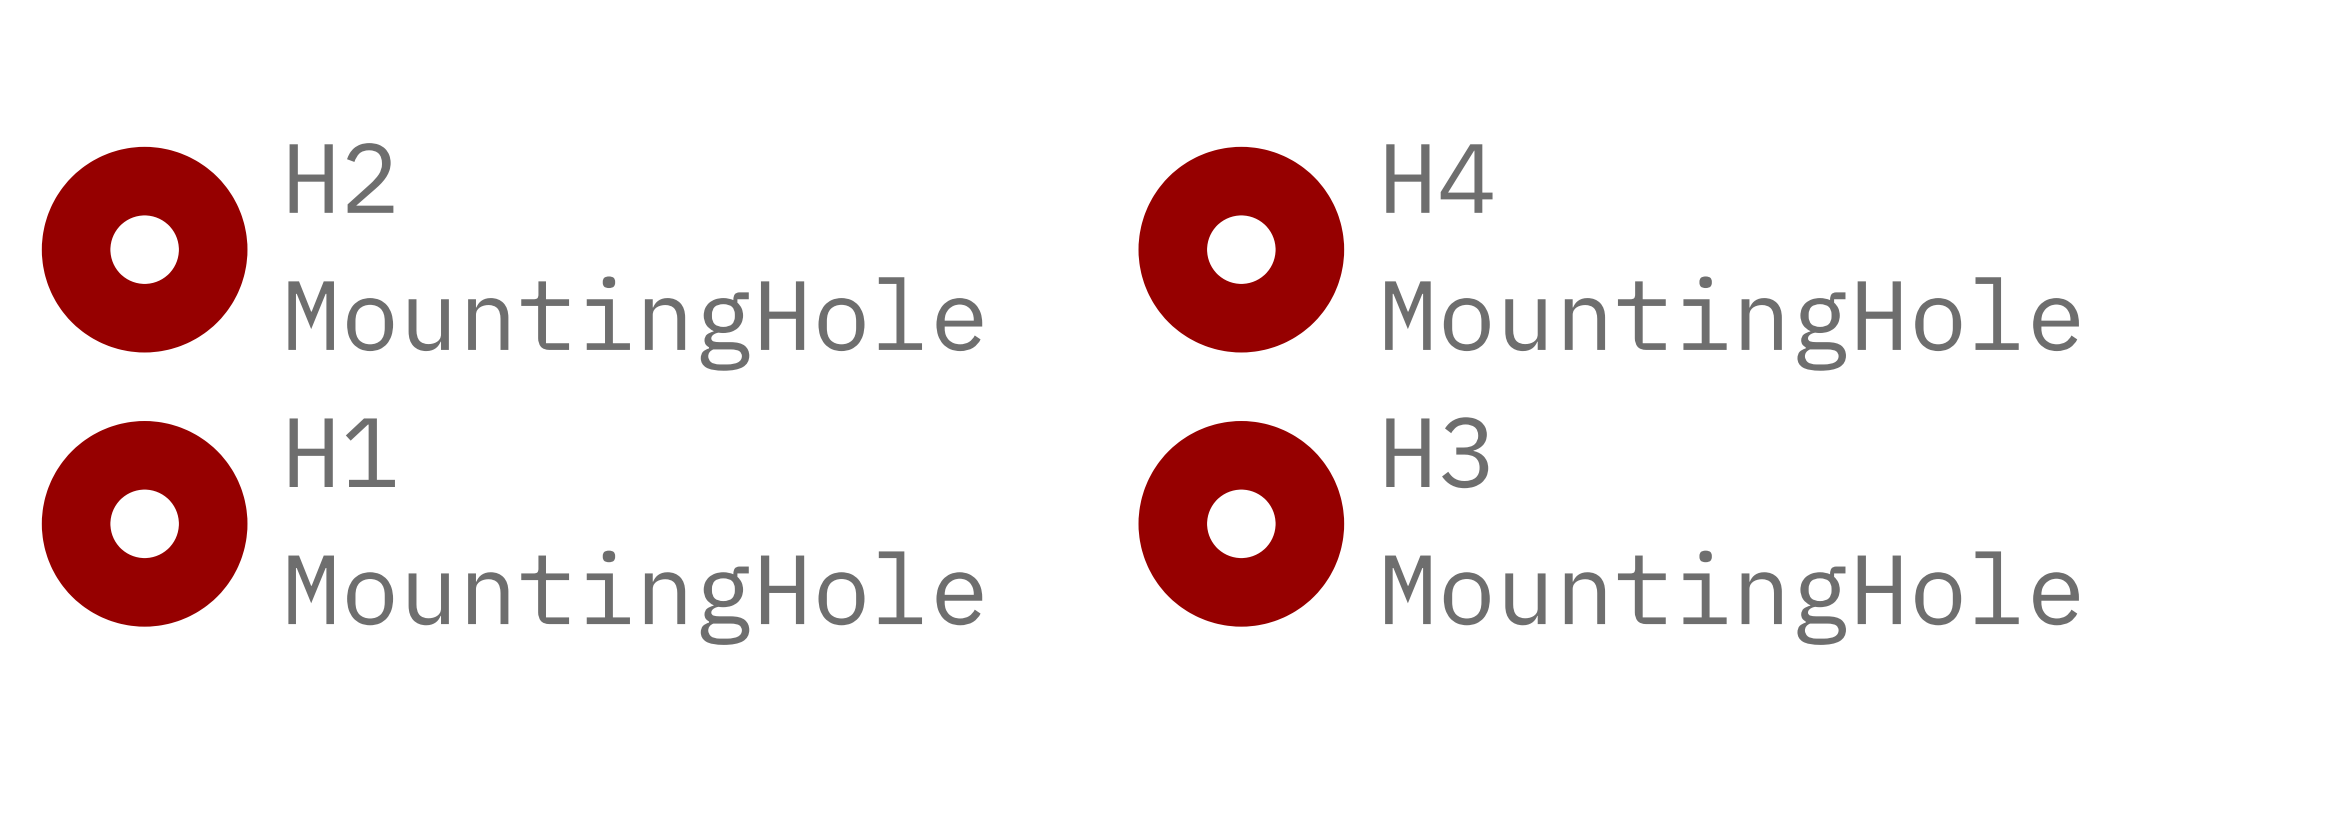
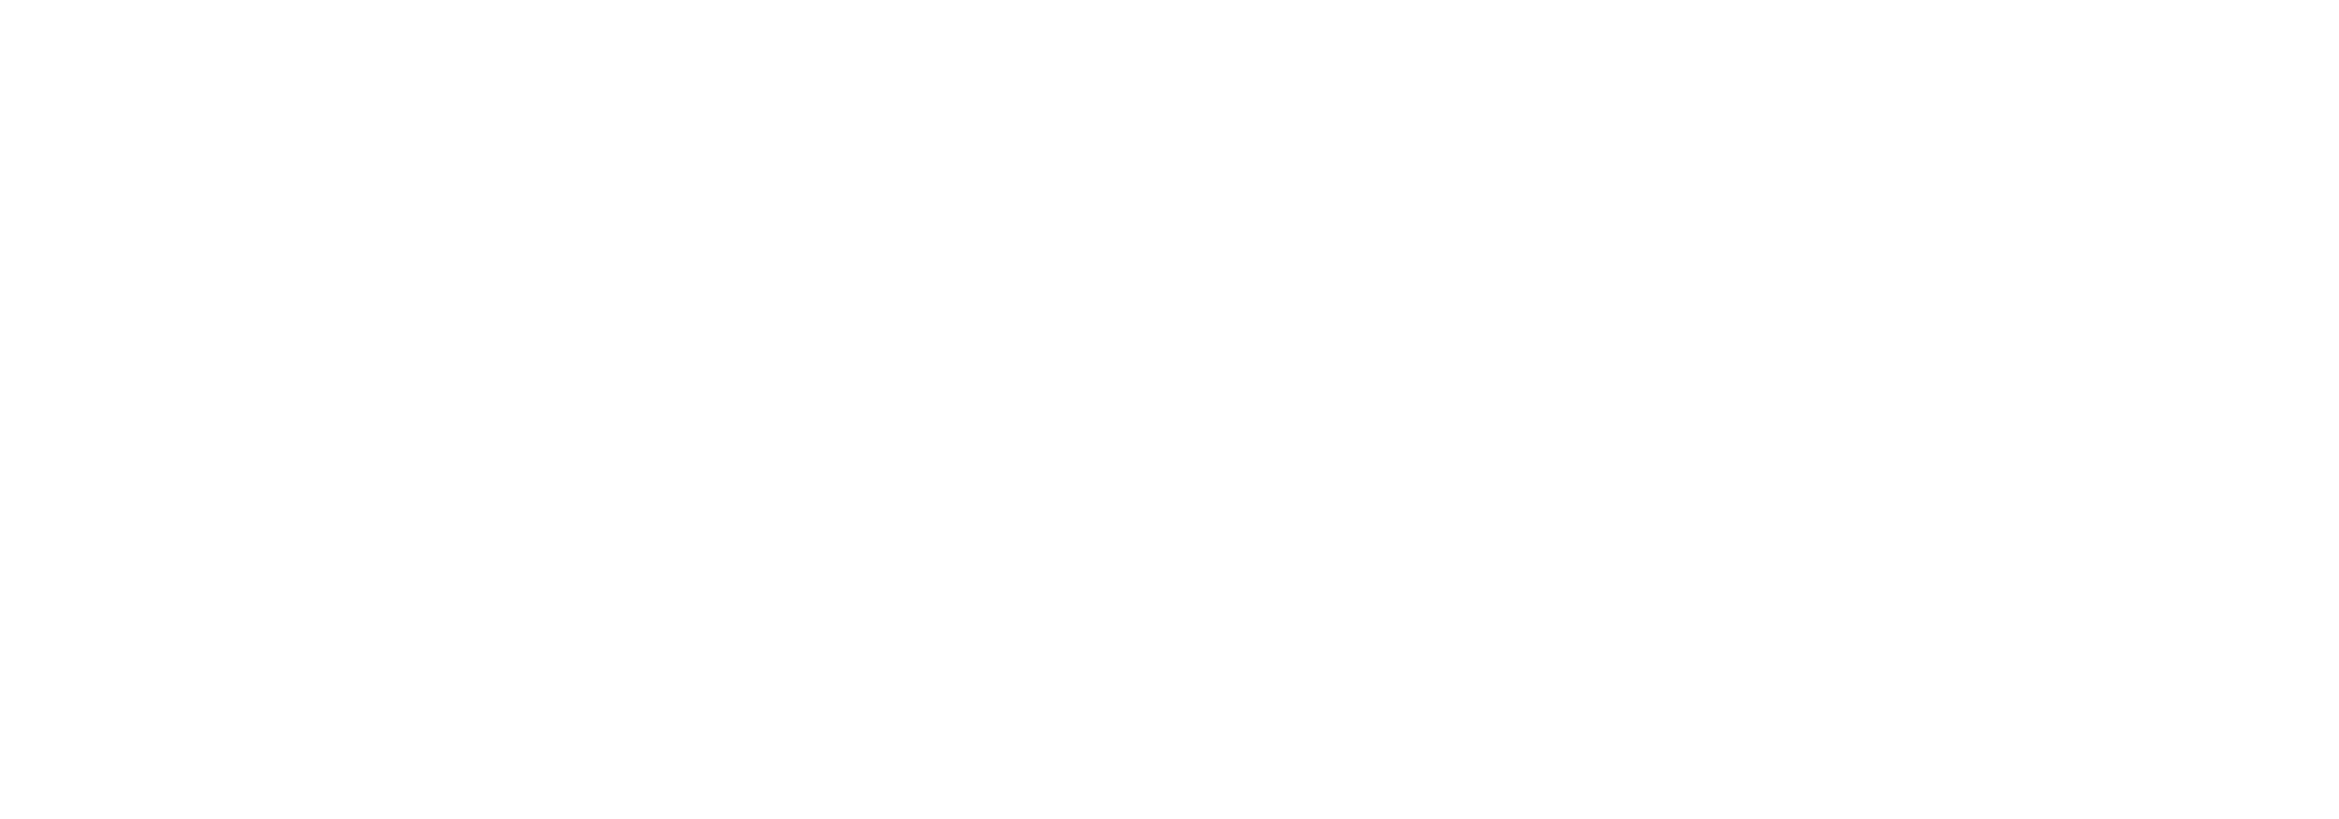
H2: MountingHole (144, 249) -> none
H4: MountingHole (1241, 249) -> none
H1: MountingHole (144, 523) -> none
H3: MountingHole (1241, 523) -> none

